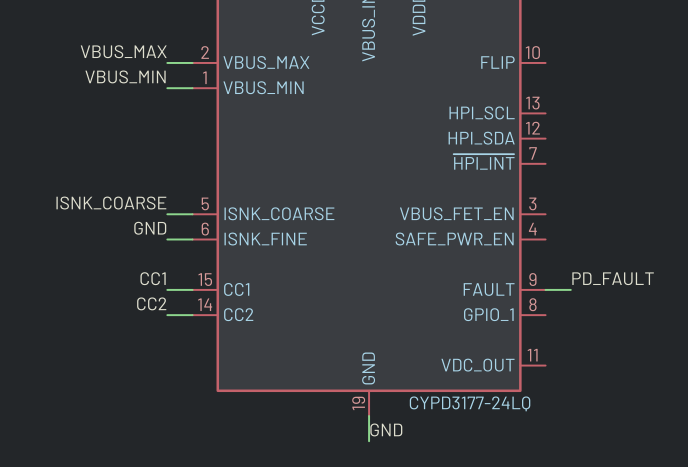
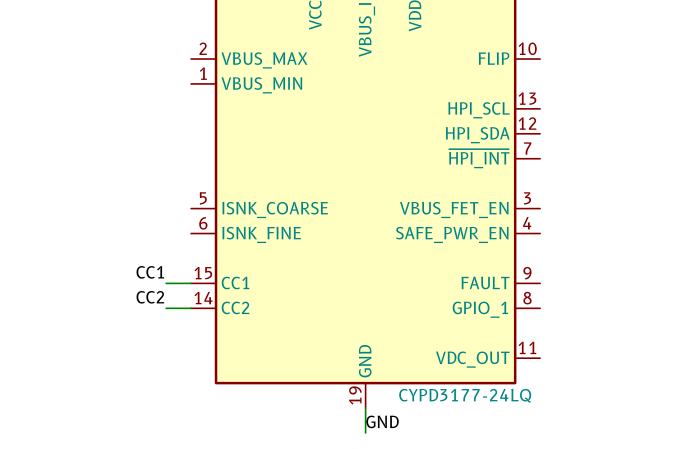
label: VBUS_MAX (123, 51) -> none
wire: (167, 62) (192, 62) -> none
label: VBUS_MIN (125, 76) -> none
wire: (167, 88) (192, 88) -> none
label: ISNK_COARSE (111, 203) -> none
wire: (167, 214) (192, 214) -> none
label: GND (150, 228) -> none
wire: (167, 239) (192, 239) -> none
label: PD_FAULT (613, 278) -> none
wire: (545, 289) (570, 289) -> none

